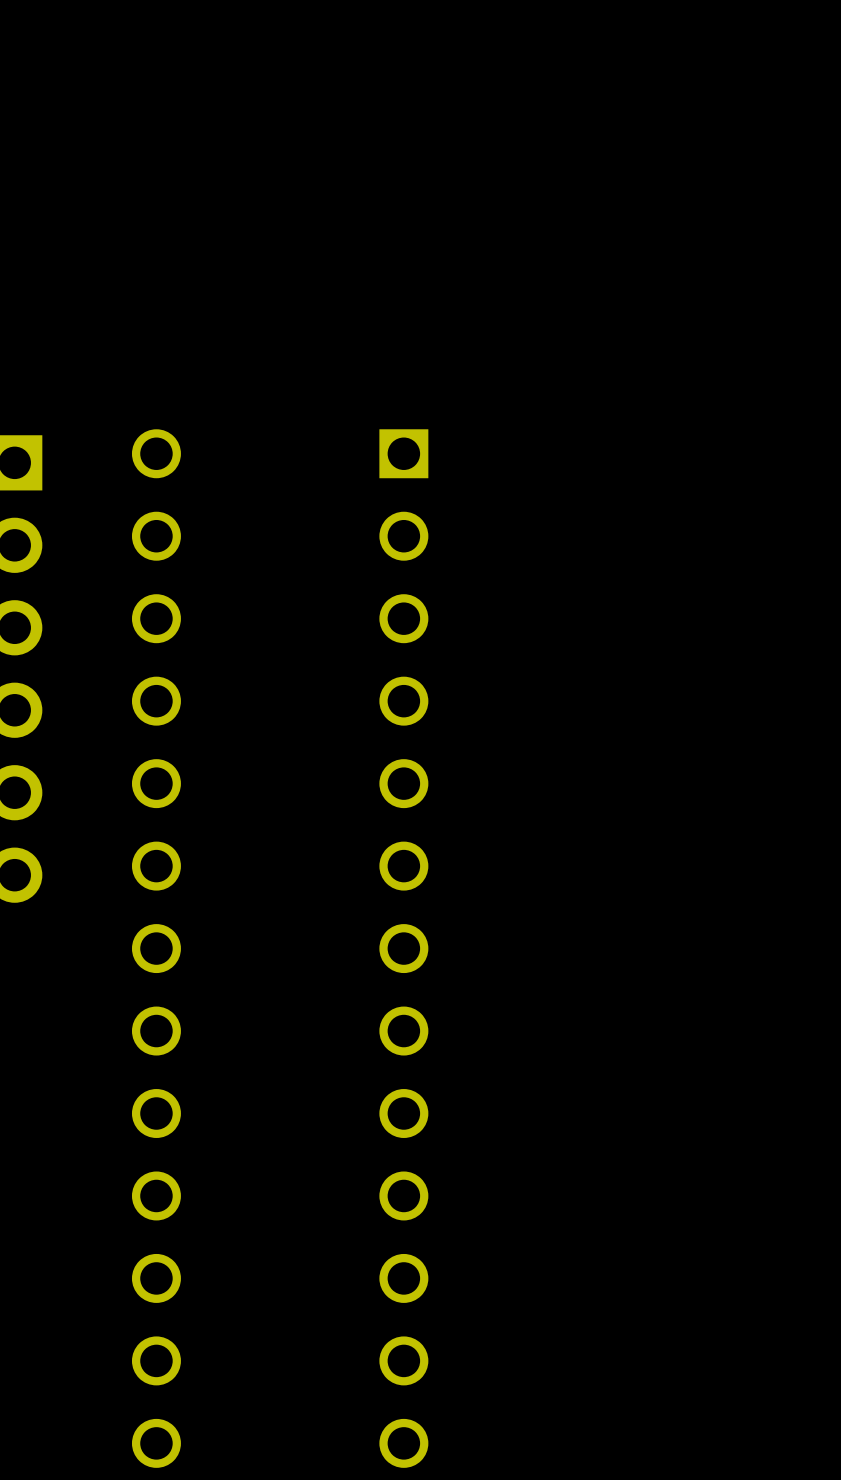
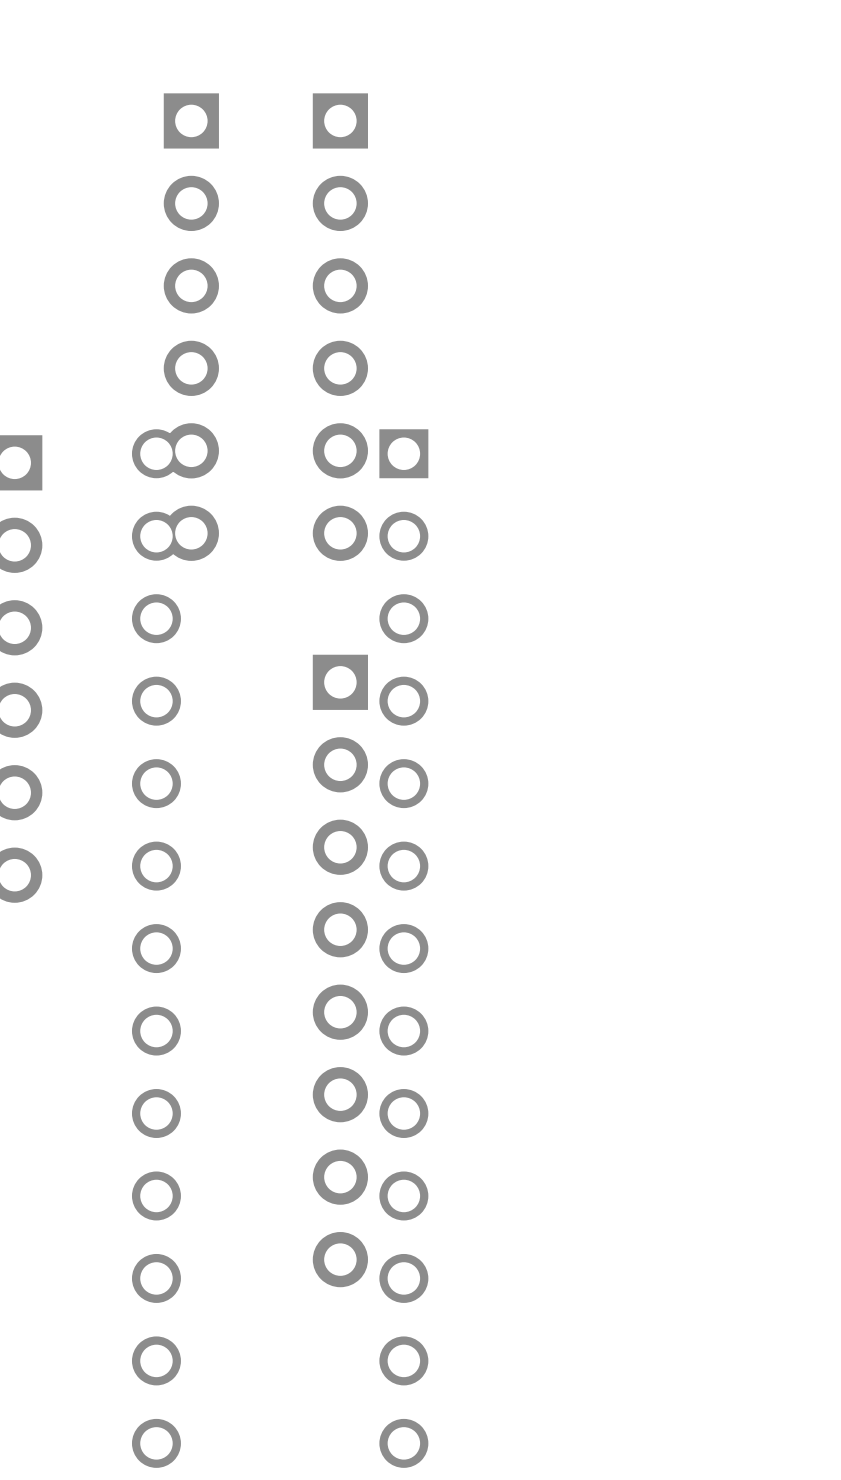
part: none -> (191, 327)
part: none -> (340, 327)
part: none -> (340, 970)

